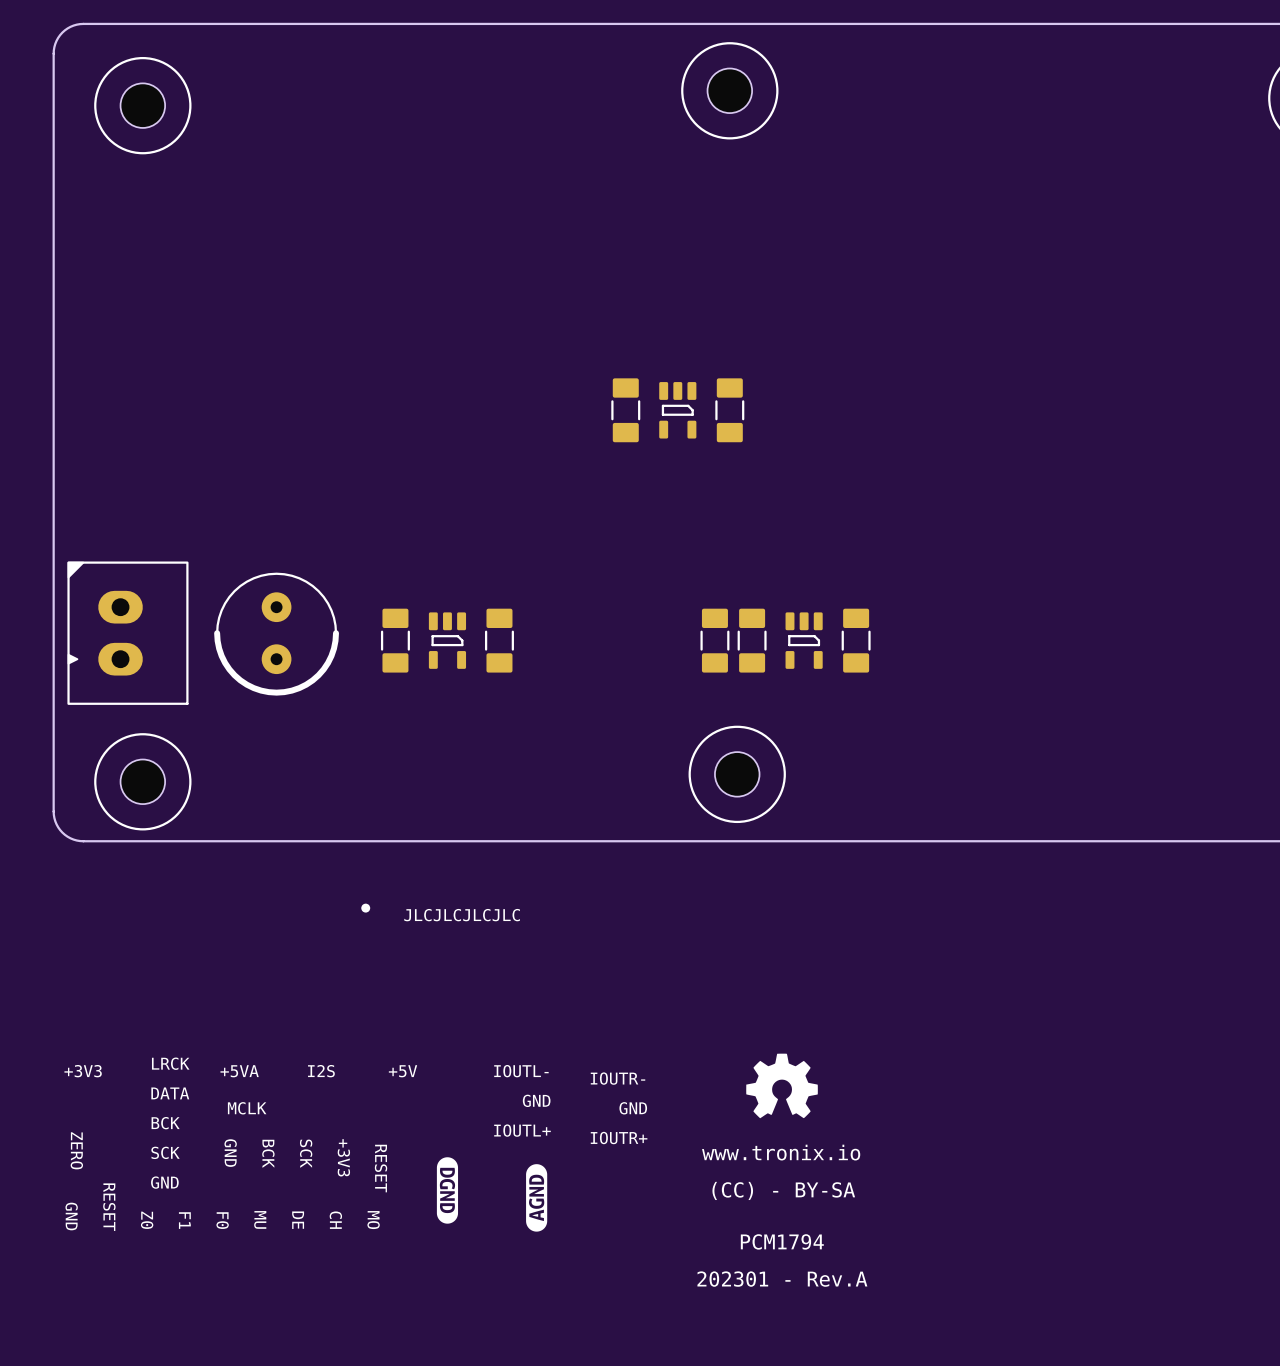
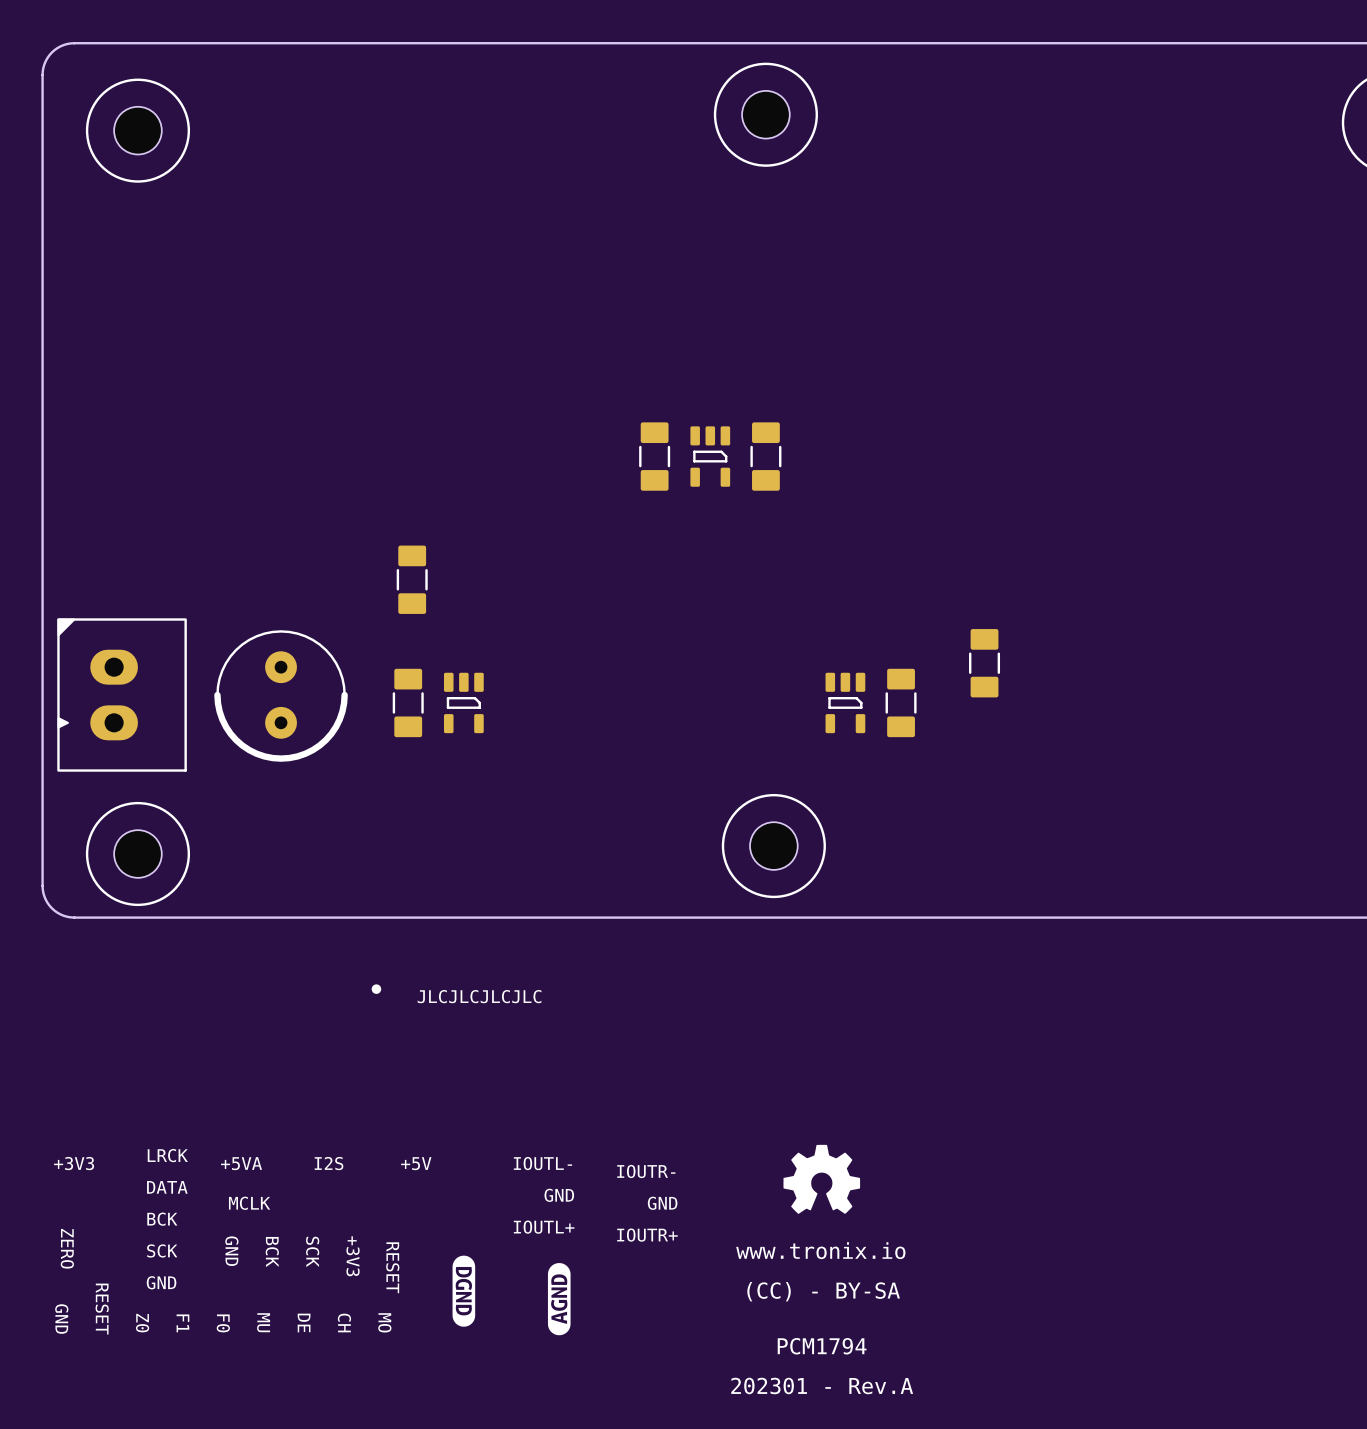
part: none -> (984, 663)
part position: (499, 640) -> (412, 579)
part: (714, 640) -> none
part: (752, 640) -> none

